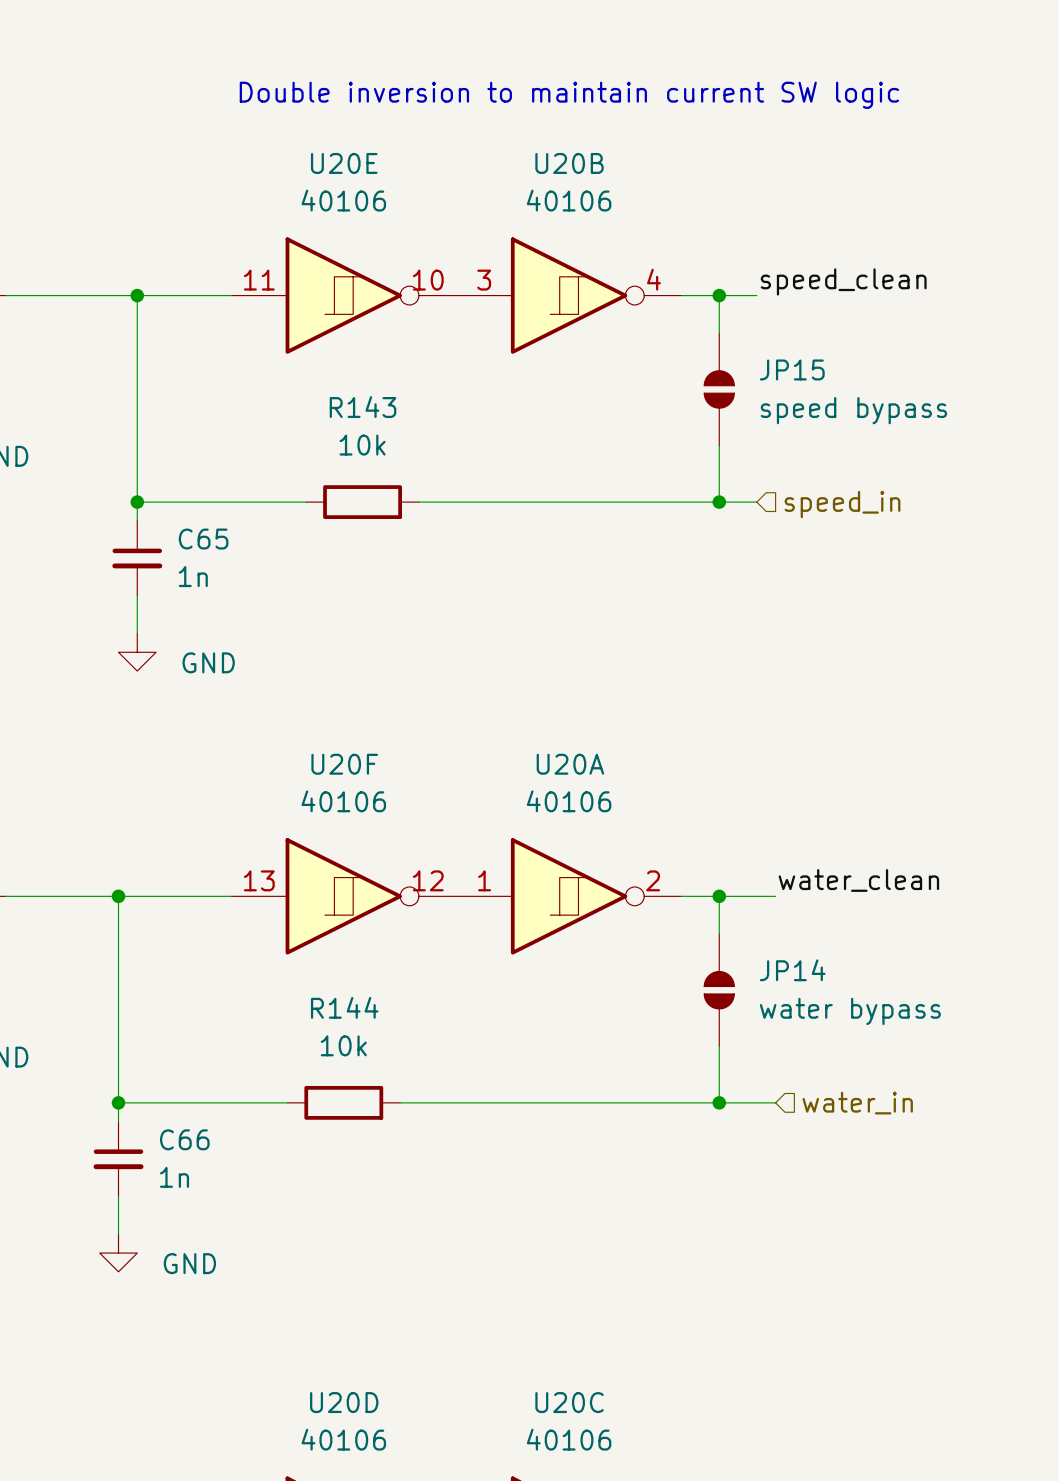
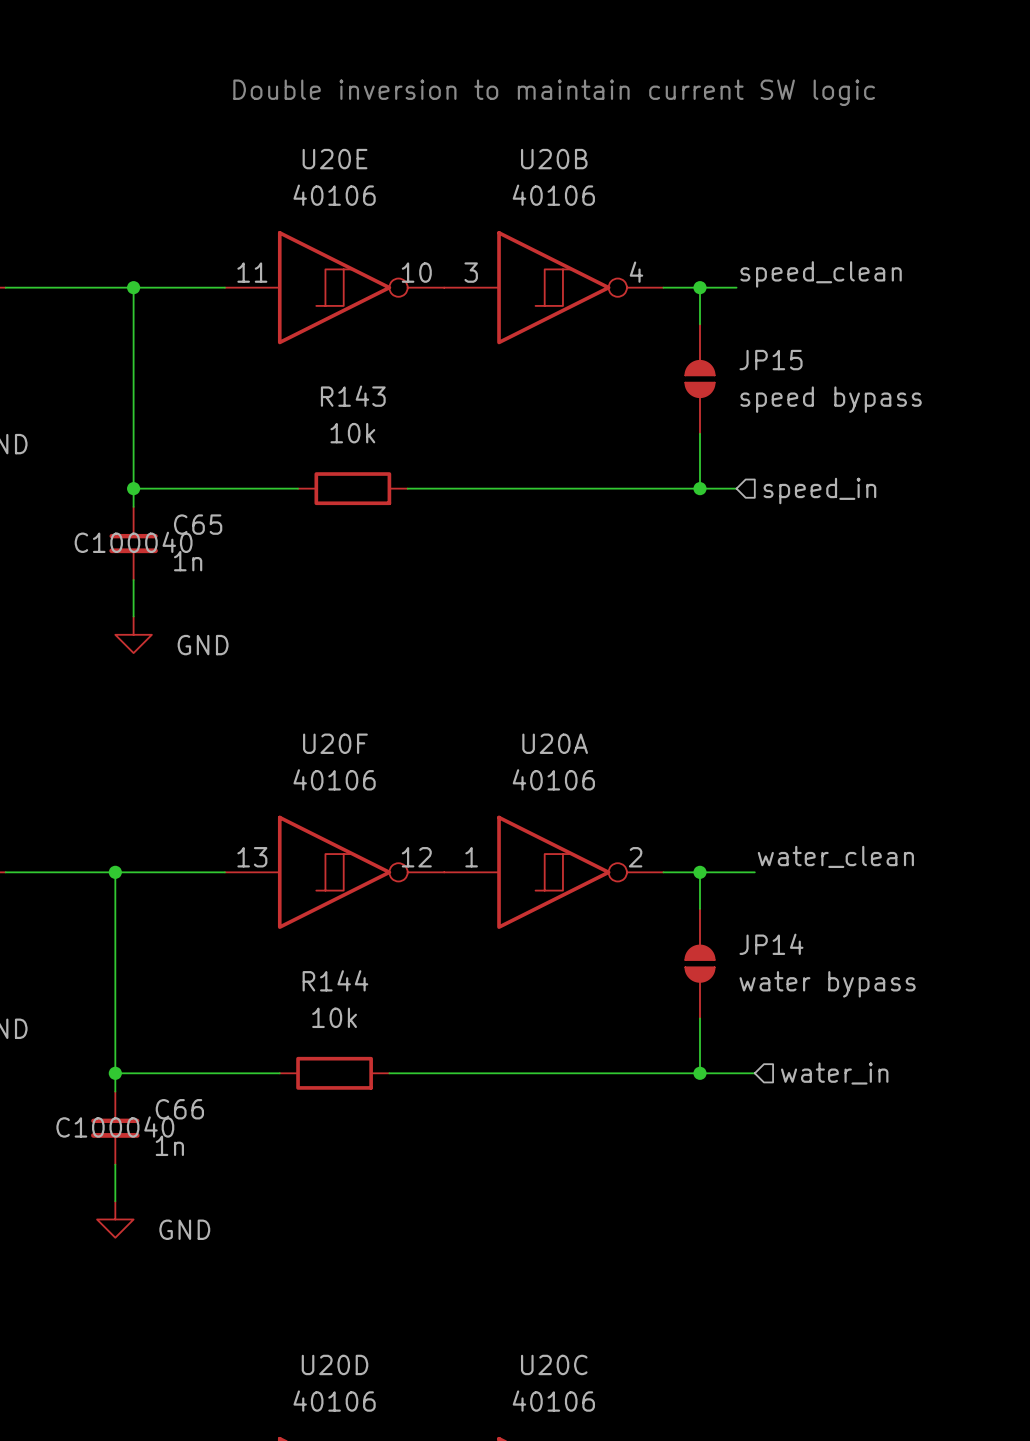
C65 text: none -> C100040 (133, 542)
C66 text: none -> C100040 (115, 1127)

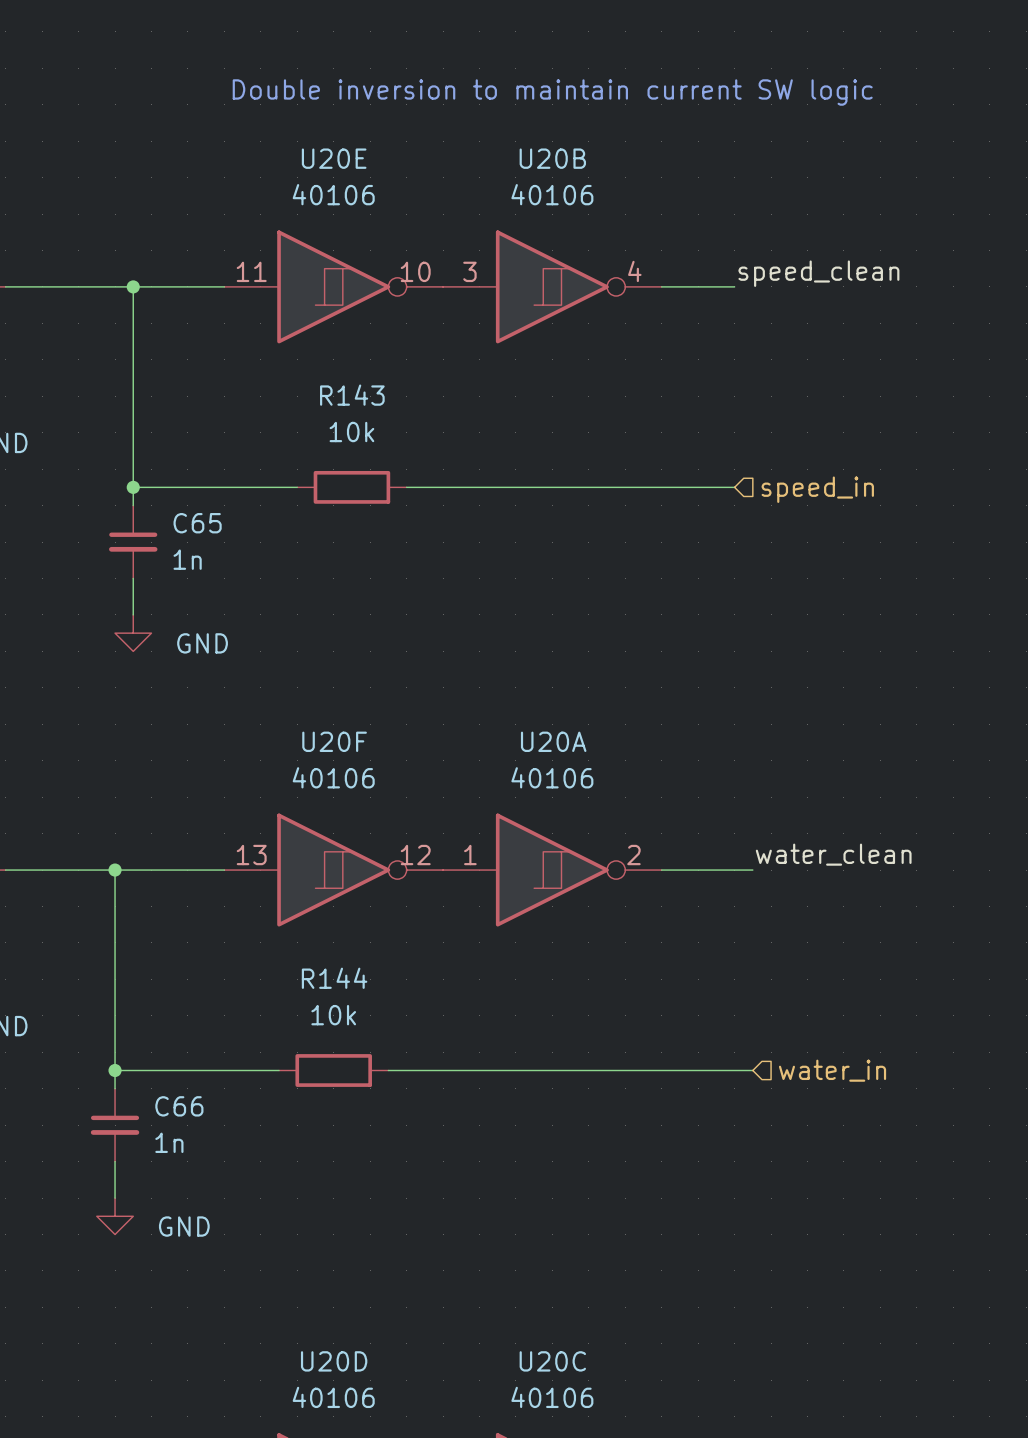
wire: (700, 287) (700, 324) -> none
junction: (700, 287) -> none
JP15: speed bypass (700, 379) -> none
wire: (700, 433) (700, 488) -> none
junction: (700, 488) -> none
C65 text: C100040 (133, 542) -> none
wire: (700, 872) (700, 908) -> none
junction: (700, 872) -> none
JP14: water bypass (700, 963) -> none
wire: (700, 1018) (700, 1073) -> none
junction: (700, 1073) -> none
C66 text: C100040 (115, 1127) -> none

